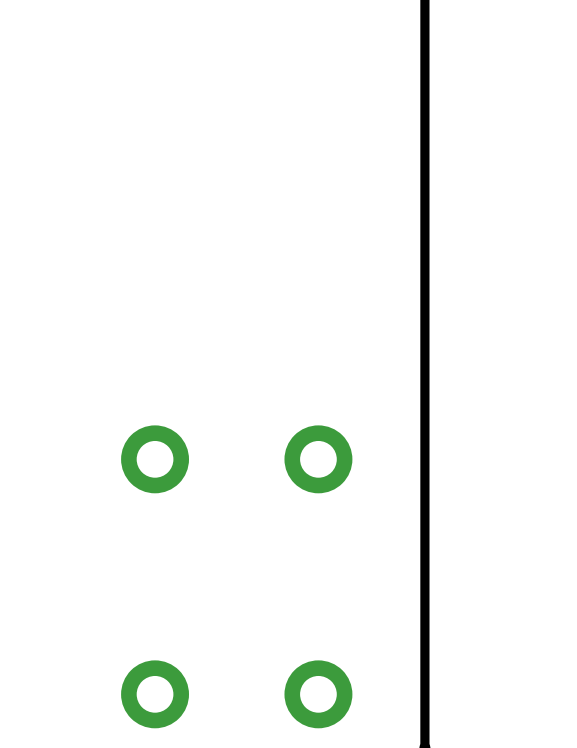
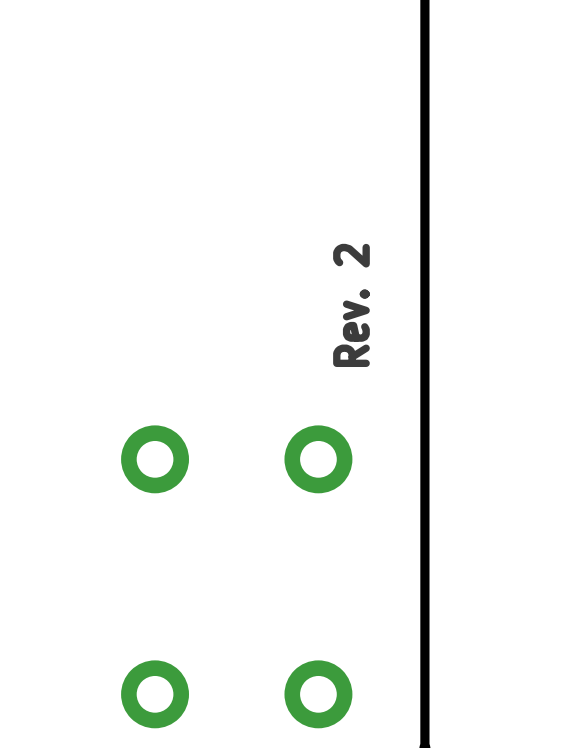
text: none -> Rev. 2 (351, 305)

